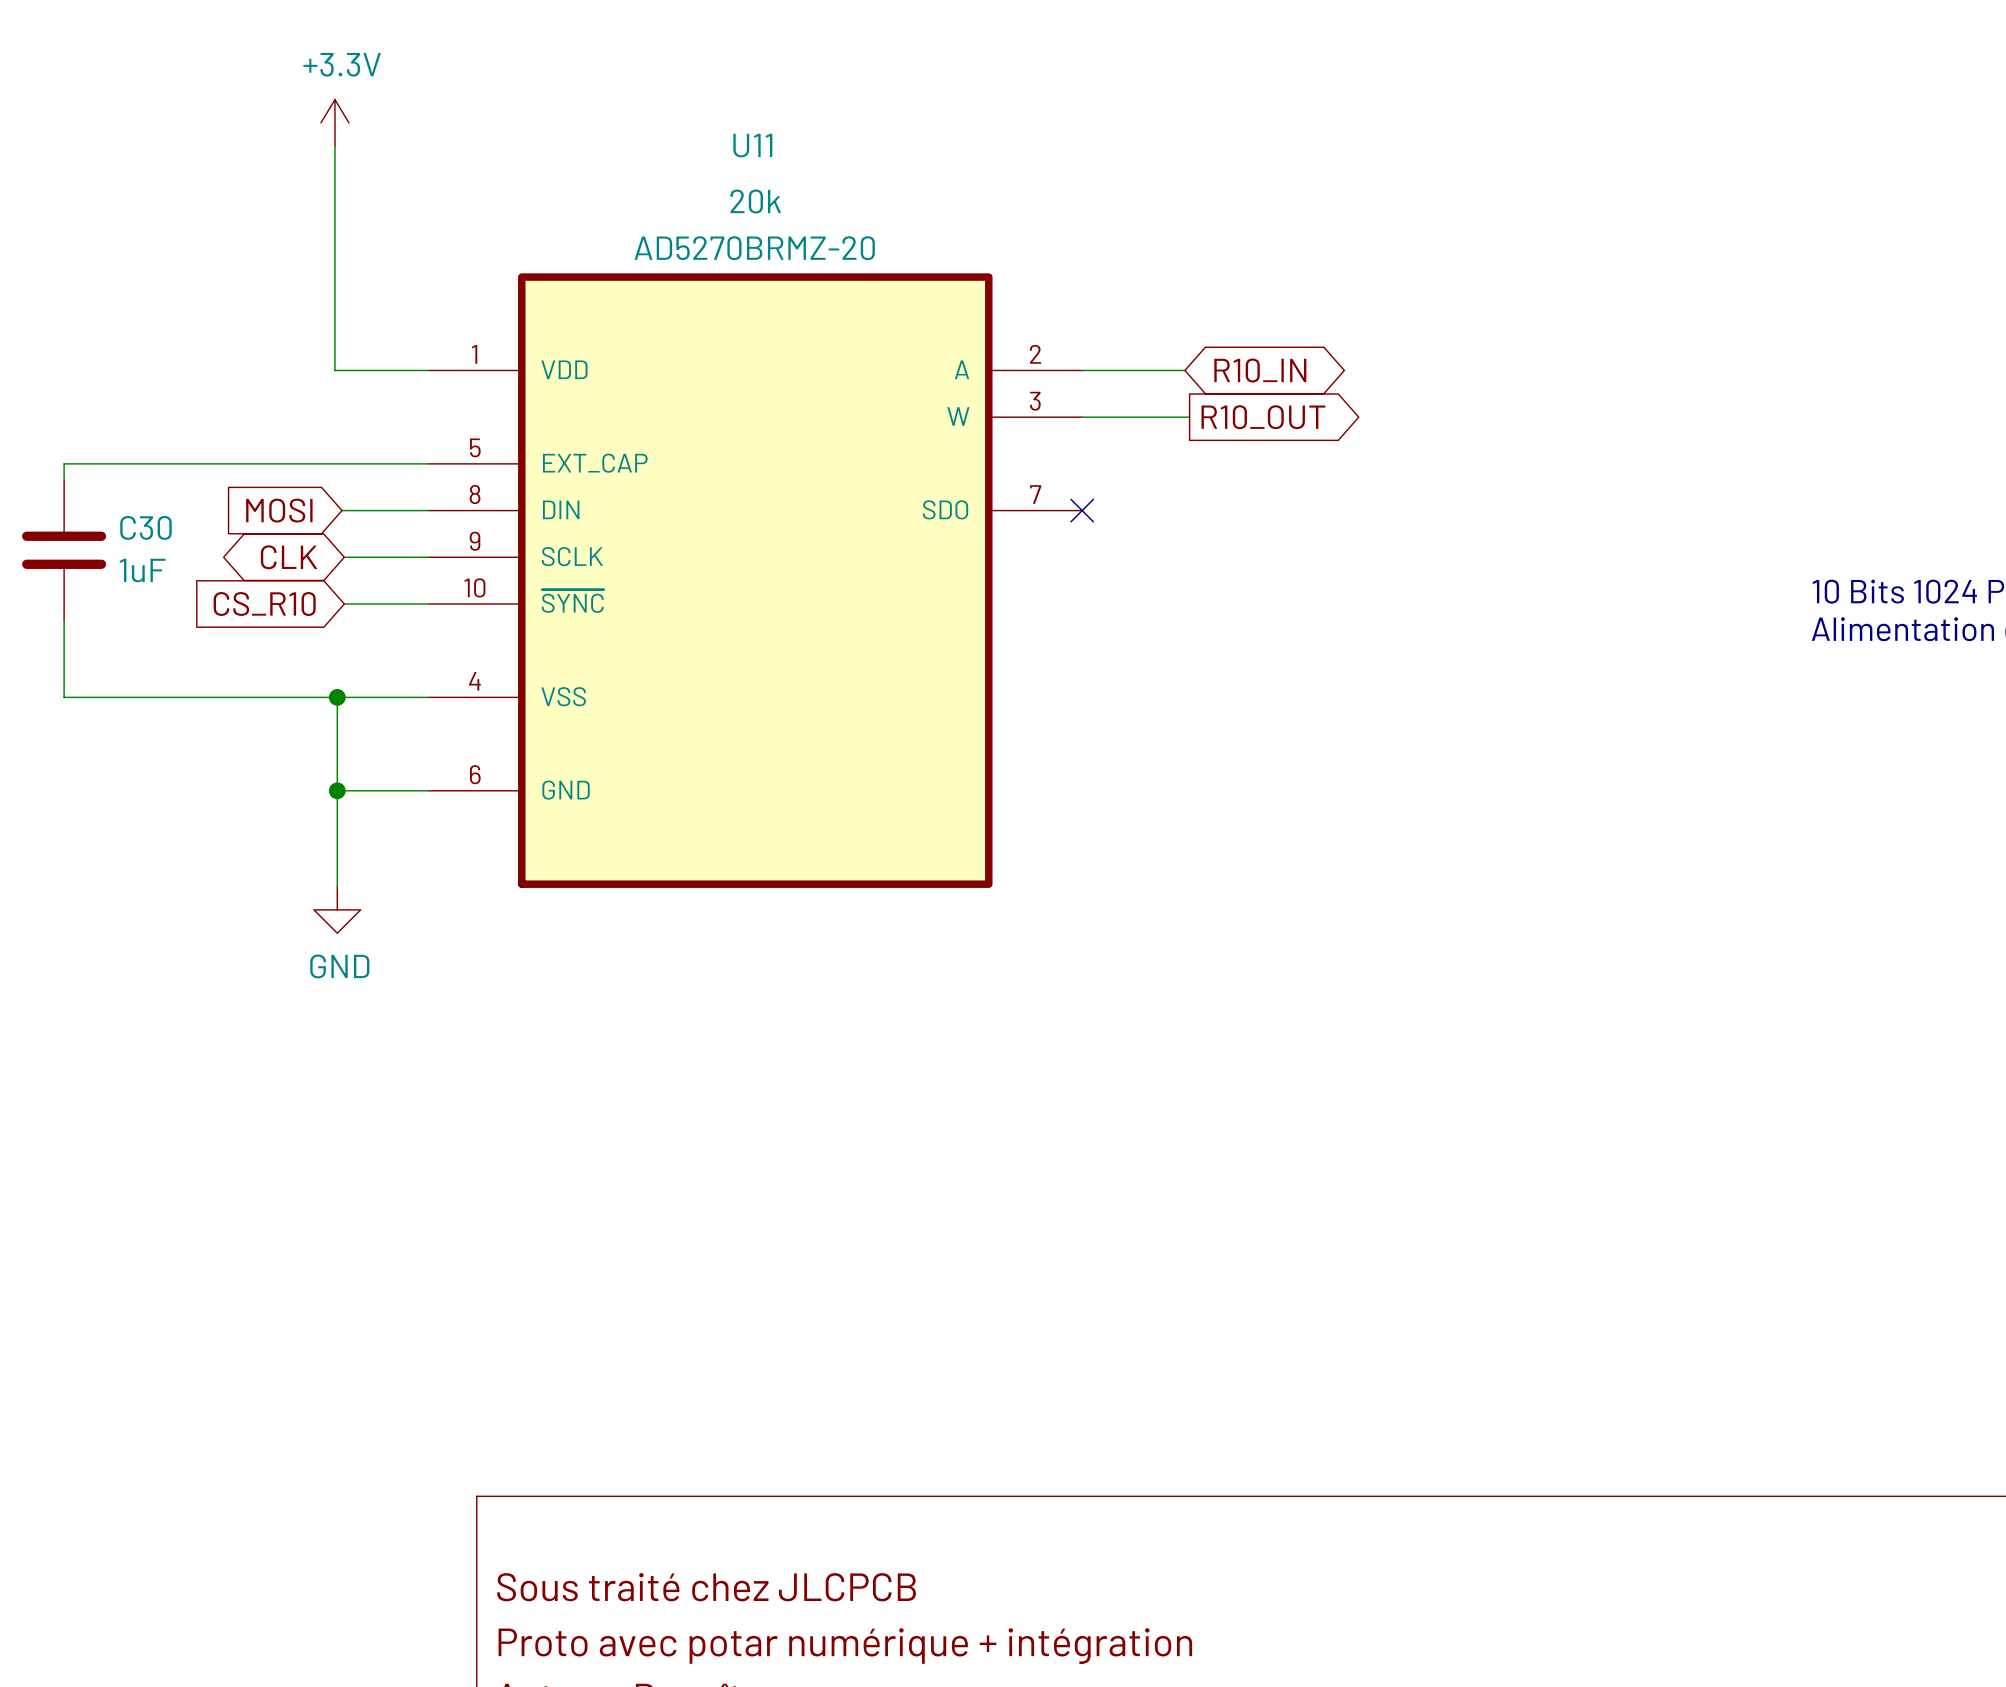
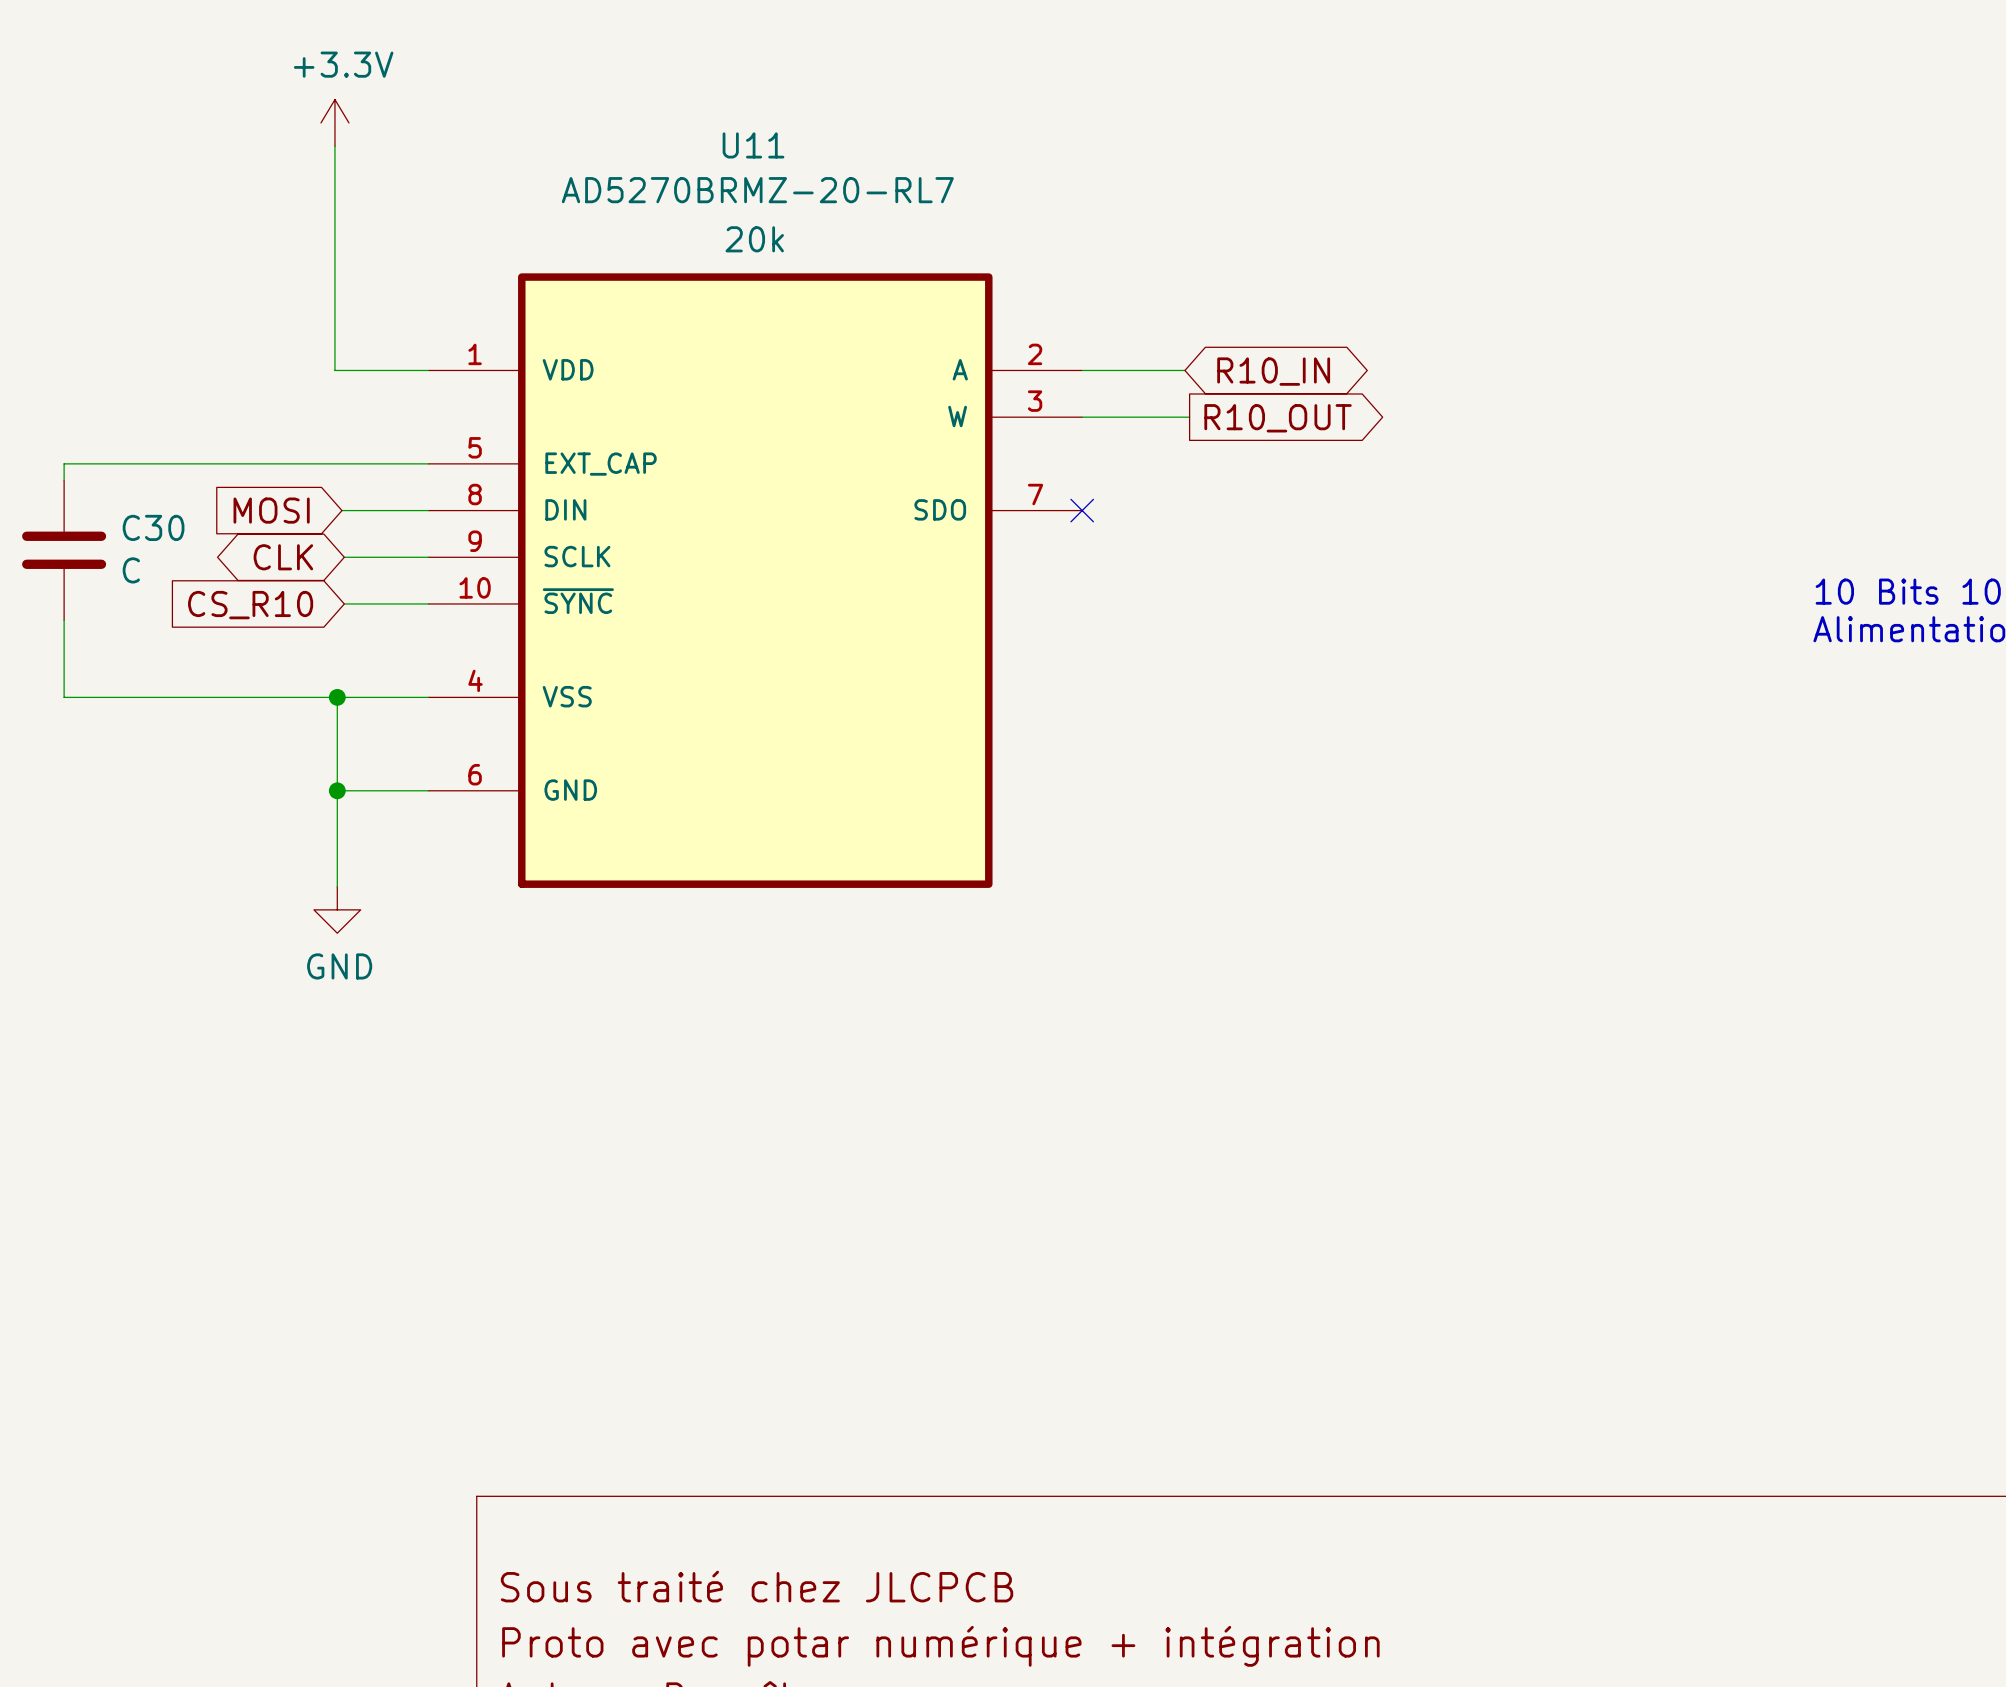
U11 value position: 20k (755, 201) -> 20k (754, 239)
U11 text: AD5270BRMZ-20 (754, 248) -> AD5270BRMZ-20-RL7 (757, 190)
C30 value: 1uF (142, 570) -> C (131, 570)

